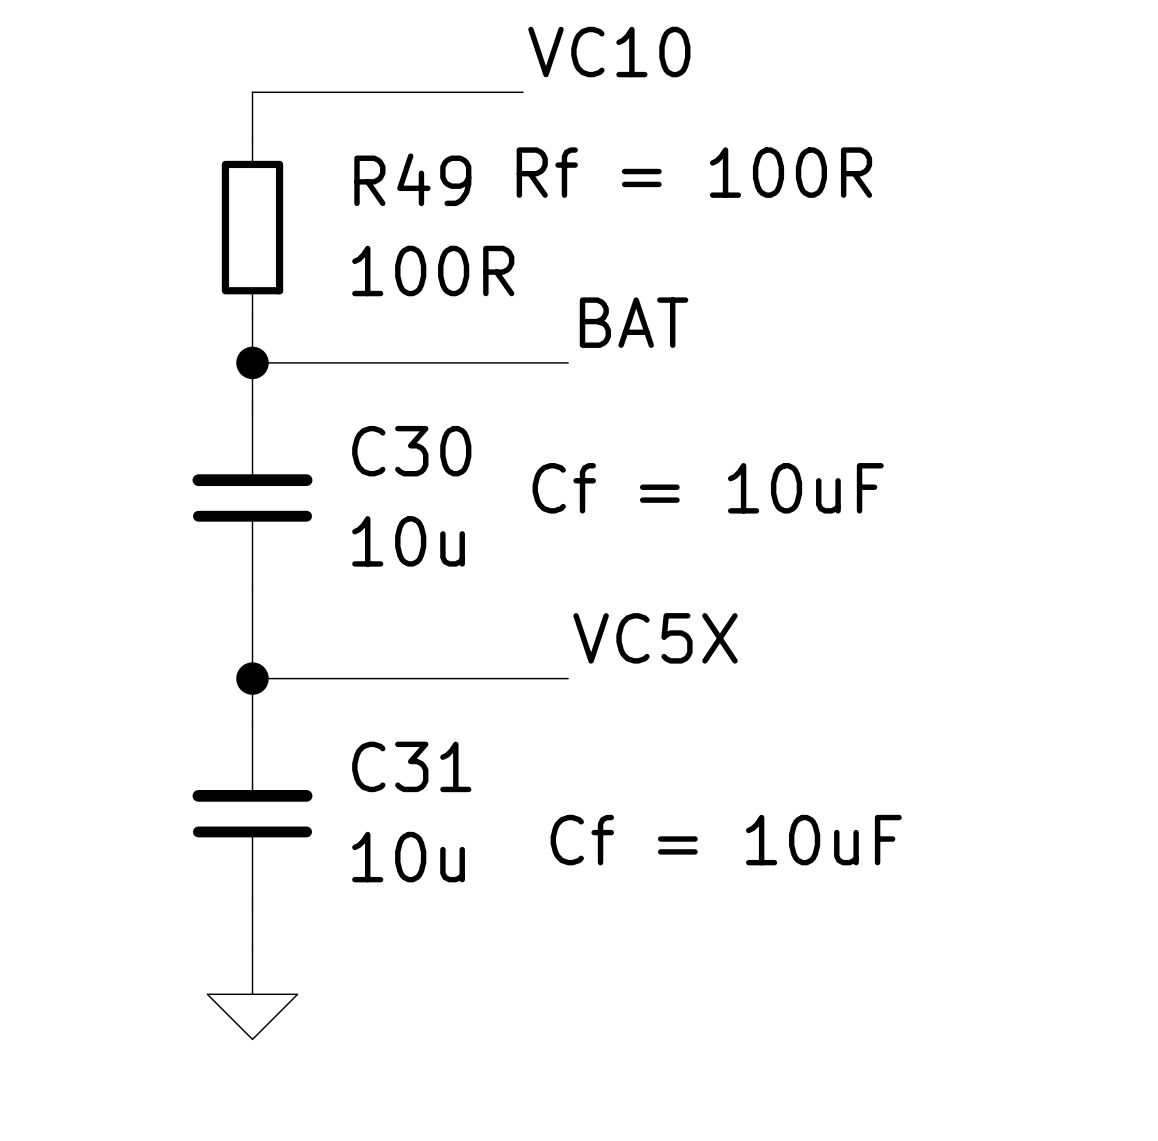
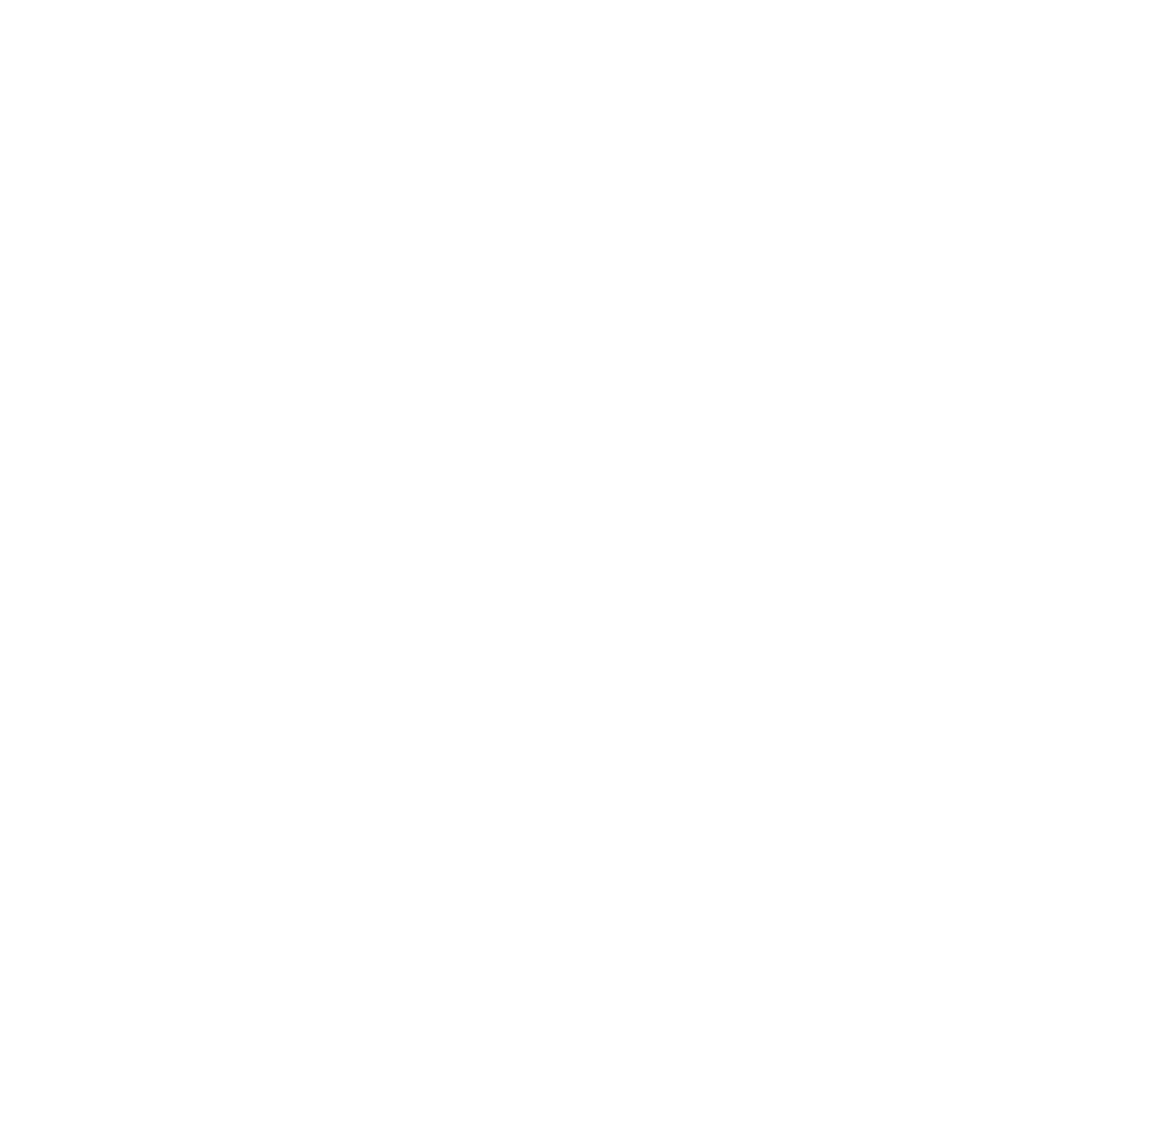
label: VC10 (609, 52) -> none
wire: (523, 92) (252, 92) (252, 137) -> none
text: Rf = 100R (694, 172) -> none
R49: 100R (252, 227) -> none
wire: (252, 317) (252, 407) -> none
label: BAT (634, 322) -> none
wire: (252, 362) (568, 362) -> none
junction: (252, 362) -> none
text: Cf = 10uF (708, 488) -> none
C30: 10u (252, 498) -> none
wire: (252, 588) (252, 723) -> none
label: VC5X (655, 638) -> none
wire: (252, 678) (568, 678) -> none
junction: (252, 678) -> none
C31: 10u (252, 813) -> none
text: Cf = 10uF (726, 840) -> none
wire: (252, 904) (252, 949) -> none
power symbol: (252, 994) -> none

